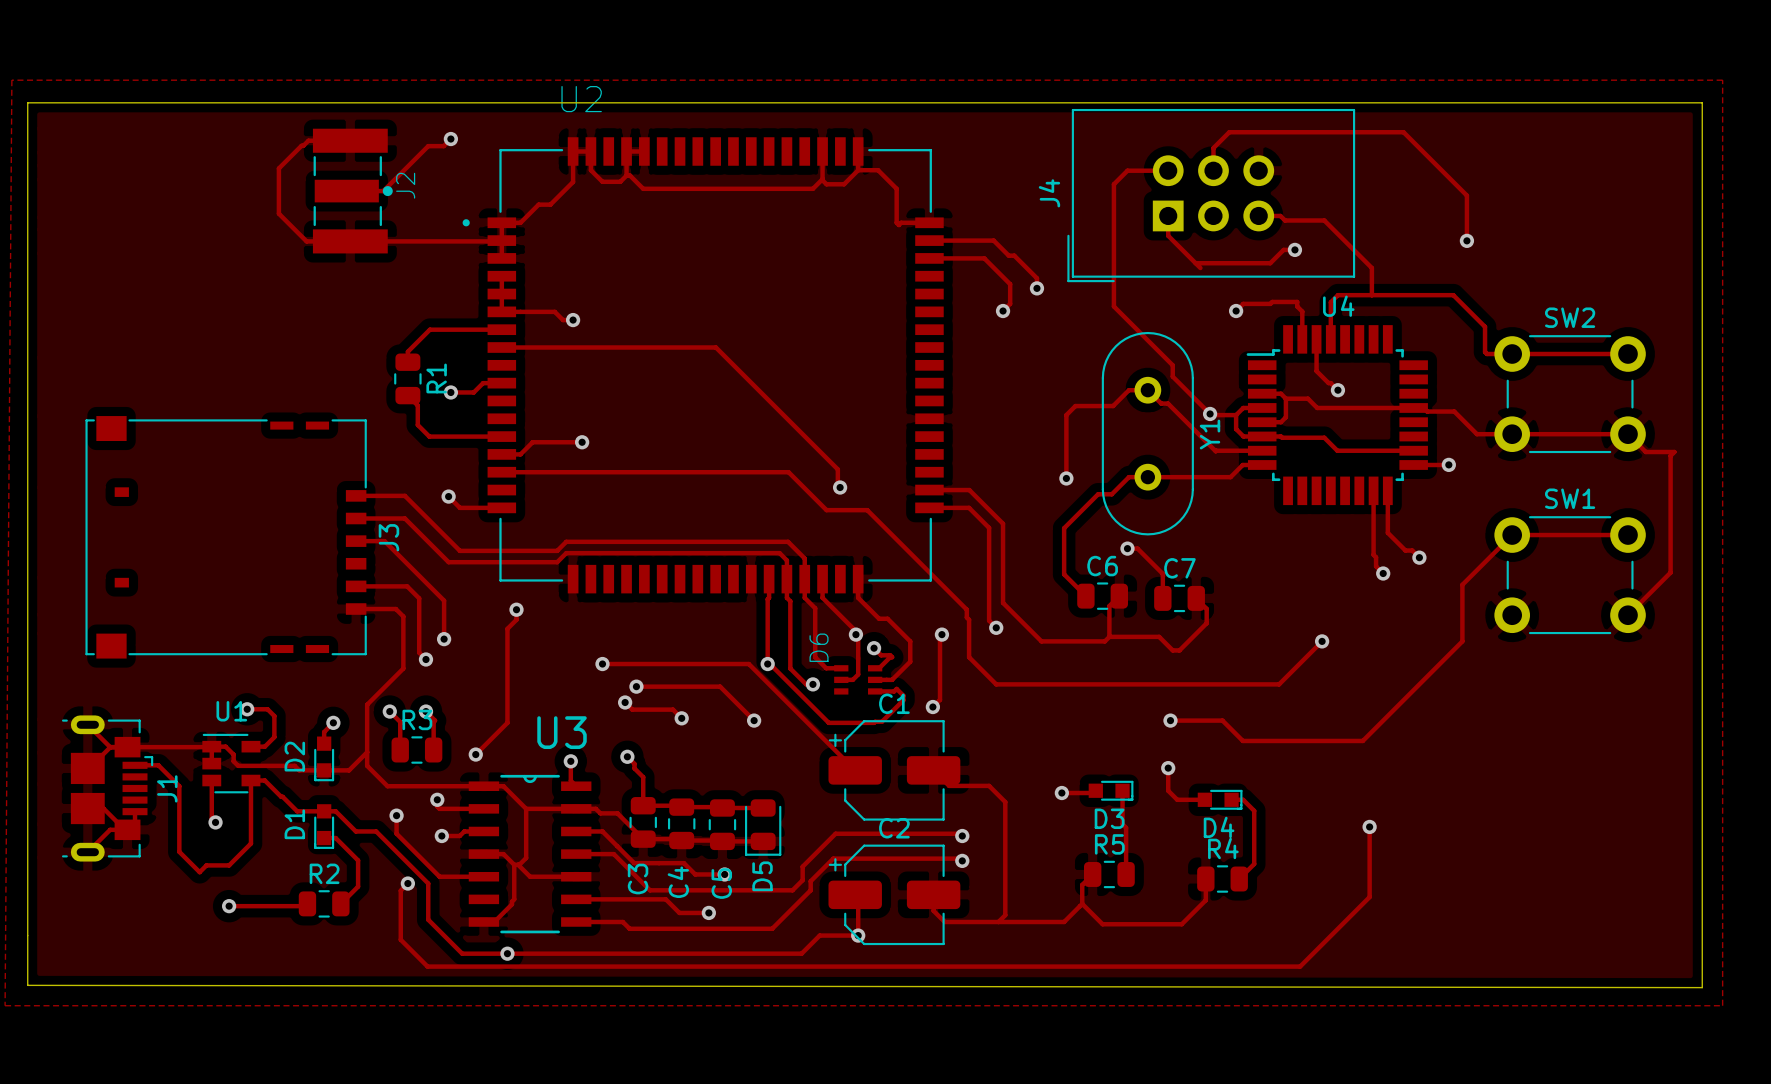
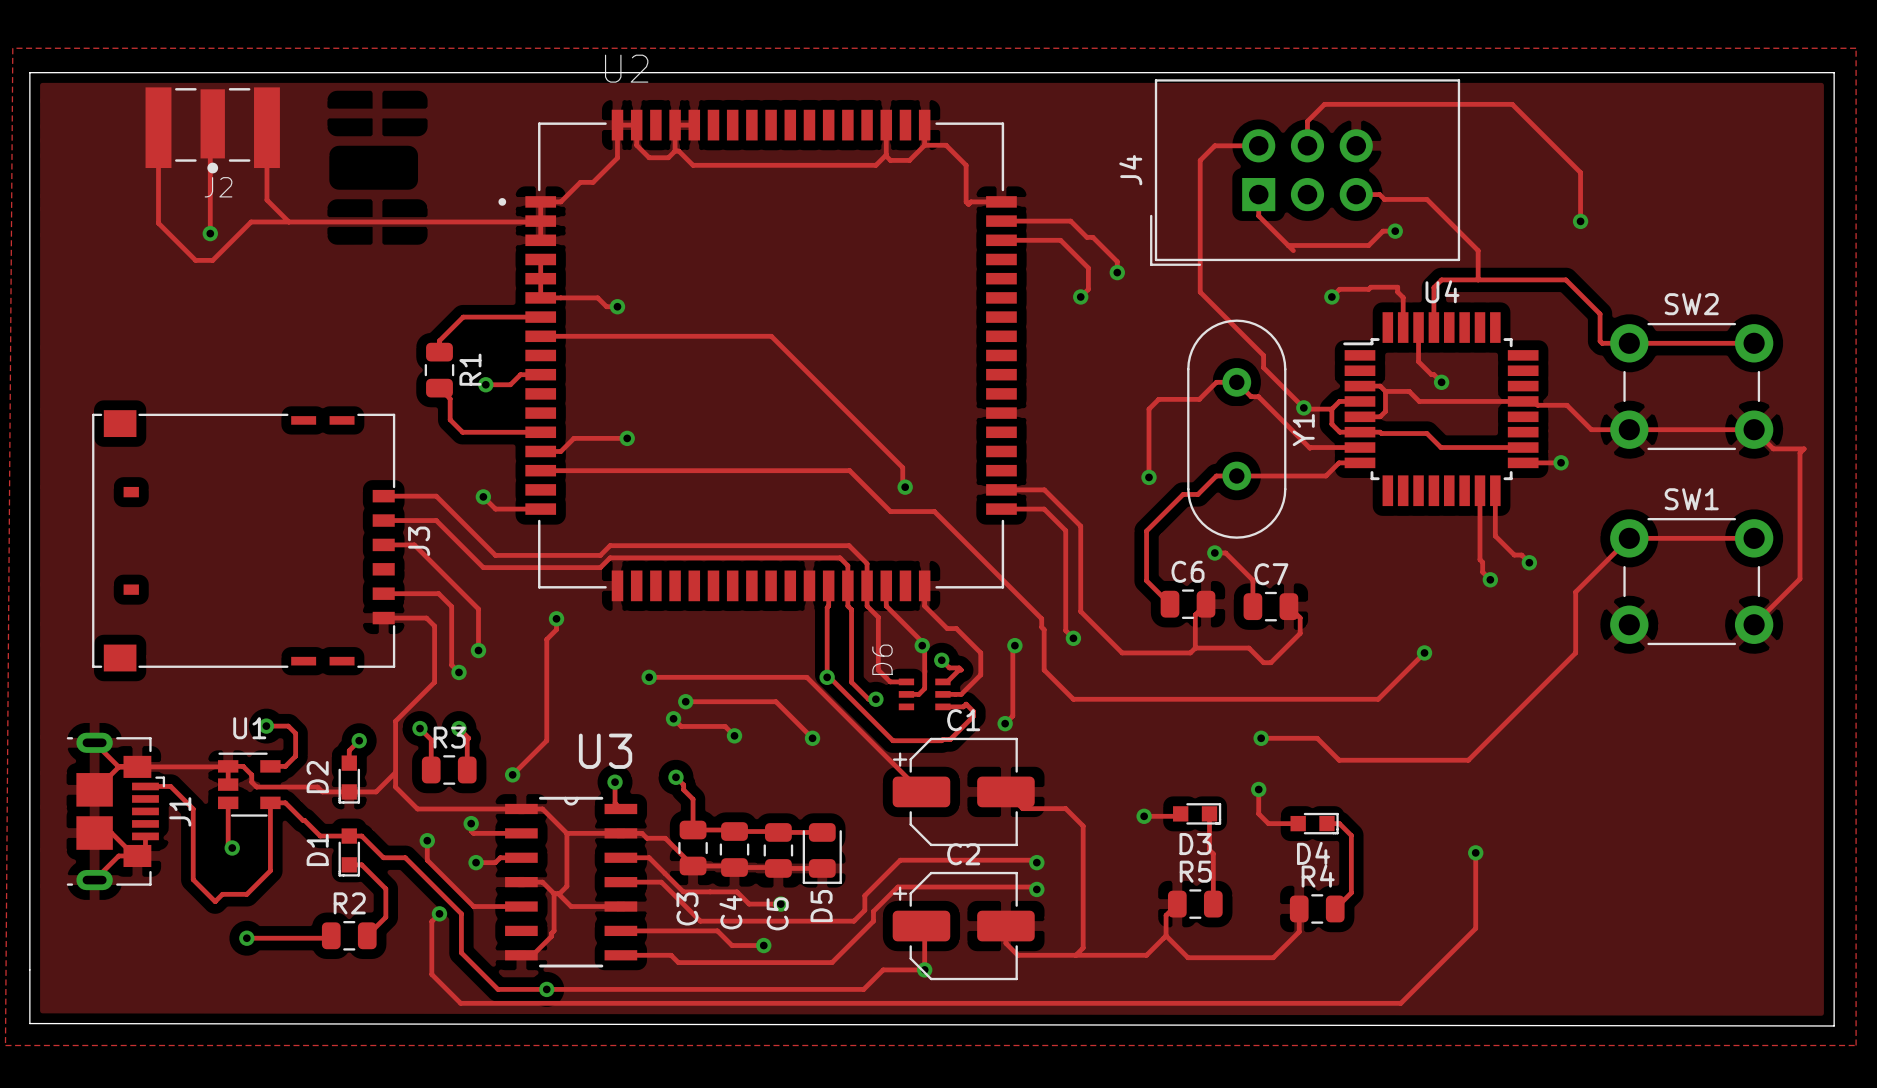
track: (450, 139) (443, 146) (428, 146) (383, 191) (346, 191) -> none
via: (450, 139) -> none
track: (350, 140) (308, 140) (278, 168) (278, 213) (306, 241) -> (158, 127) (158, 223) (195, 260) (212, 260) (251, 221) (330, 221)
track: none -> (212, 123) (210, 126) (210, 233)
track: none -> (266, 127) (266, 200) (288, 221)
J2 rotation: 0° (352, 191) -> 90° clockwise (212, 130)
J2 position: (352, 191) -> (212, 130)
via: none -> (210, 233)

